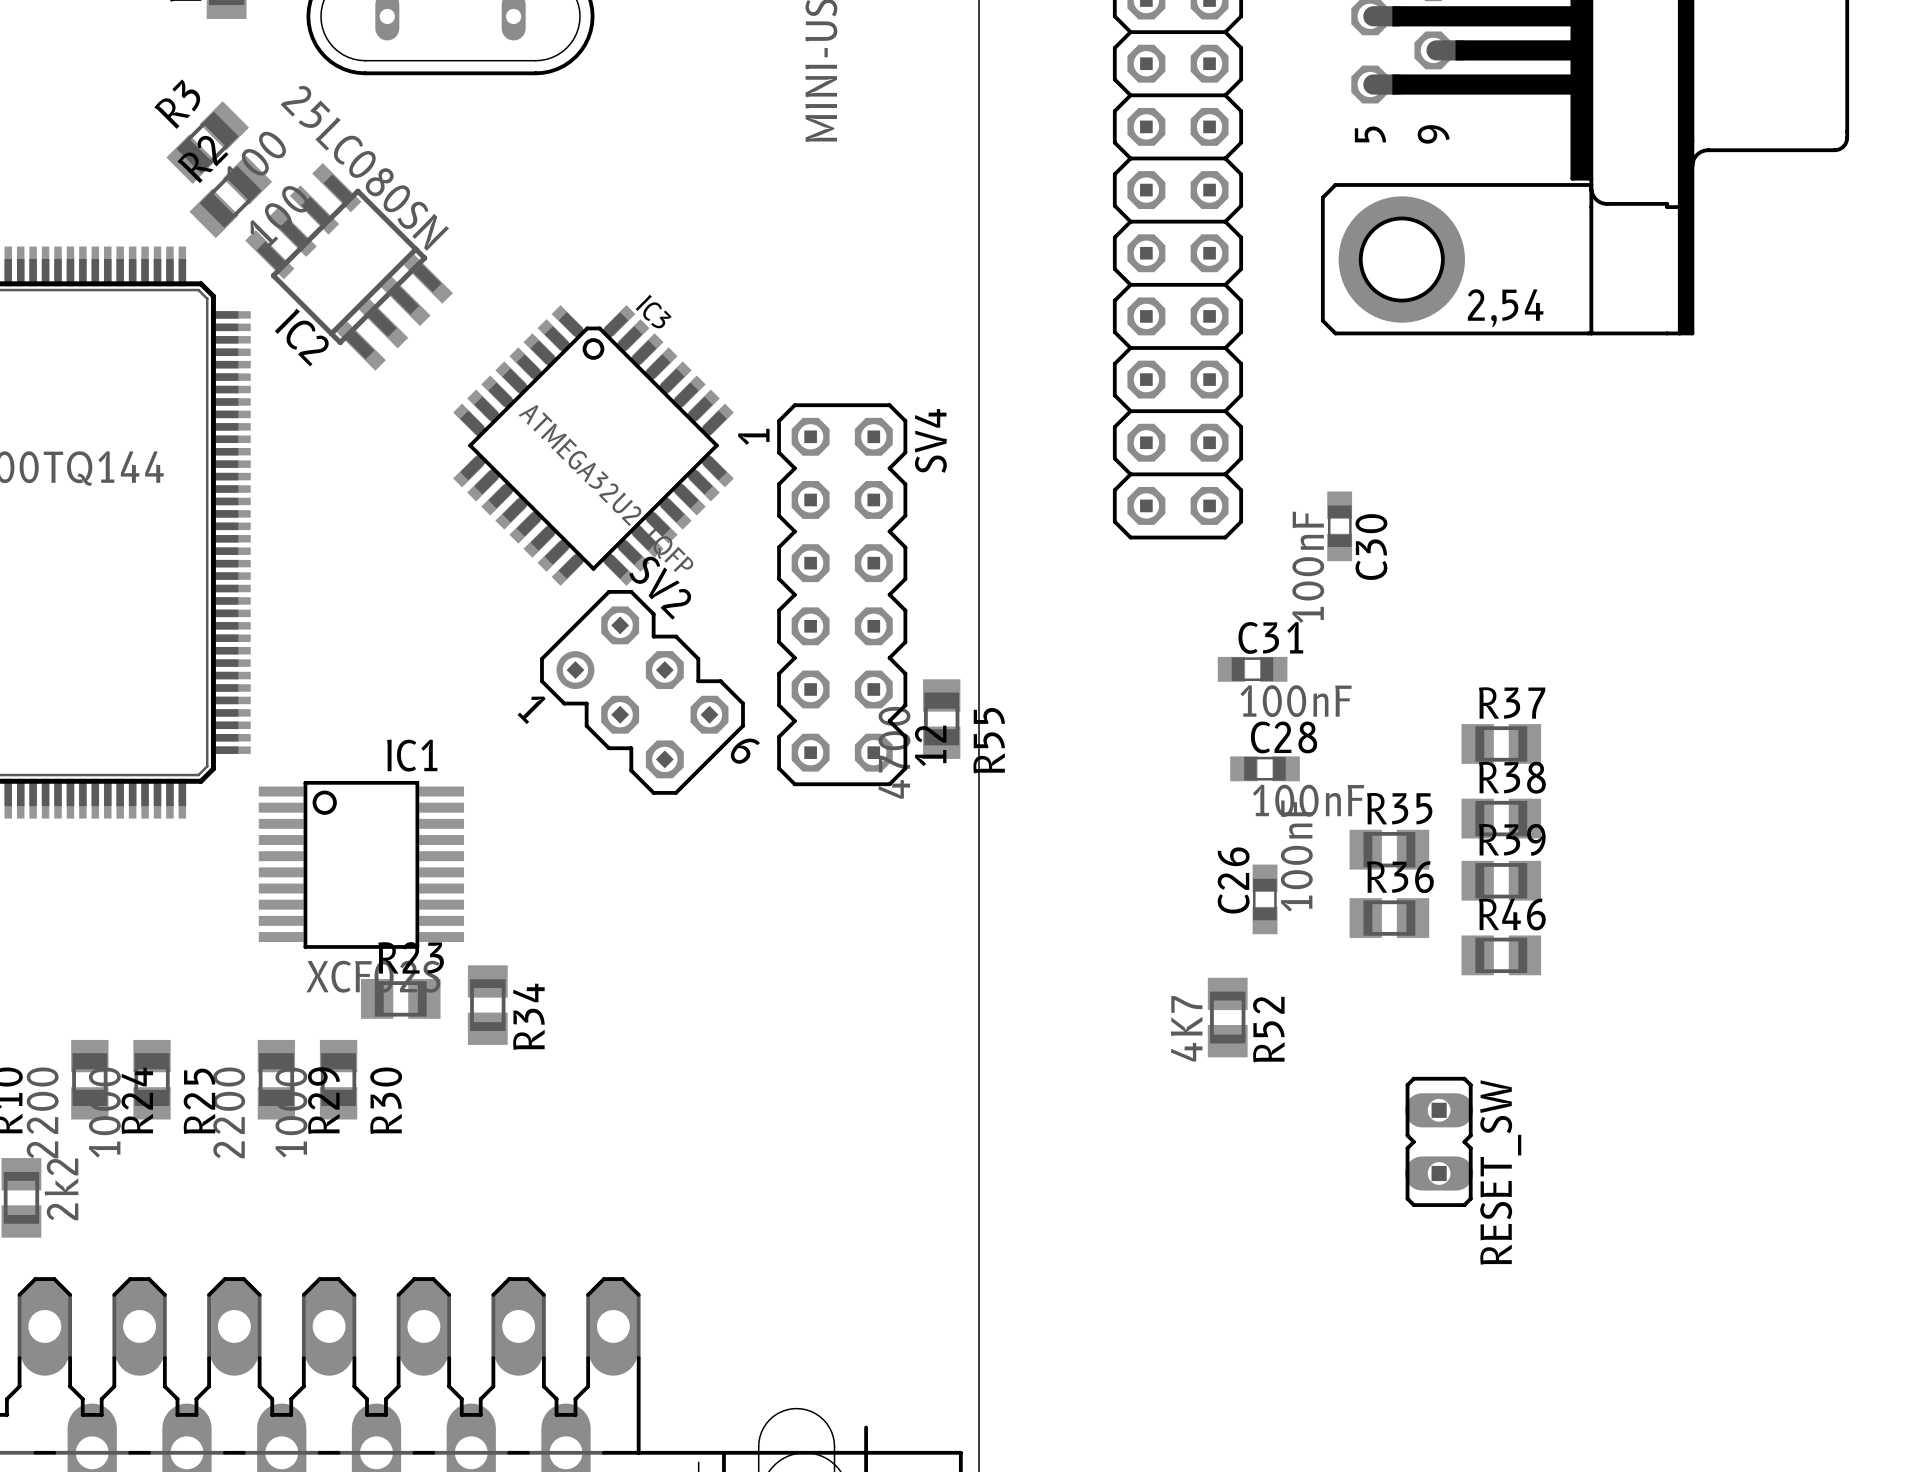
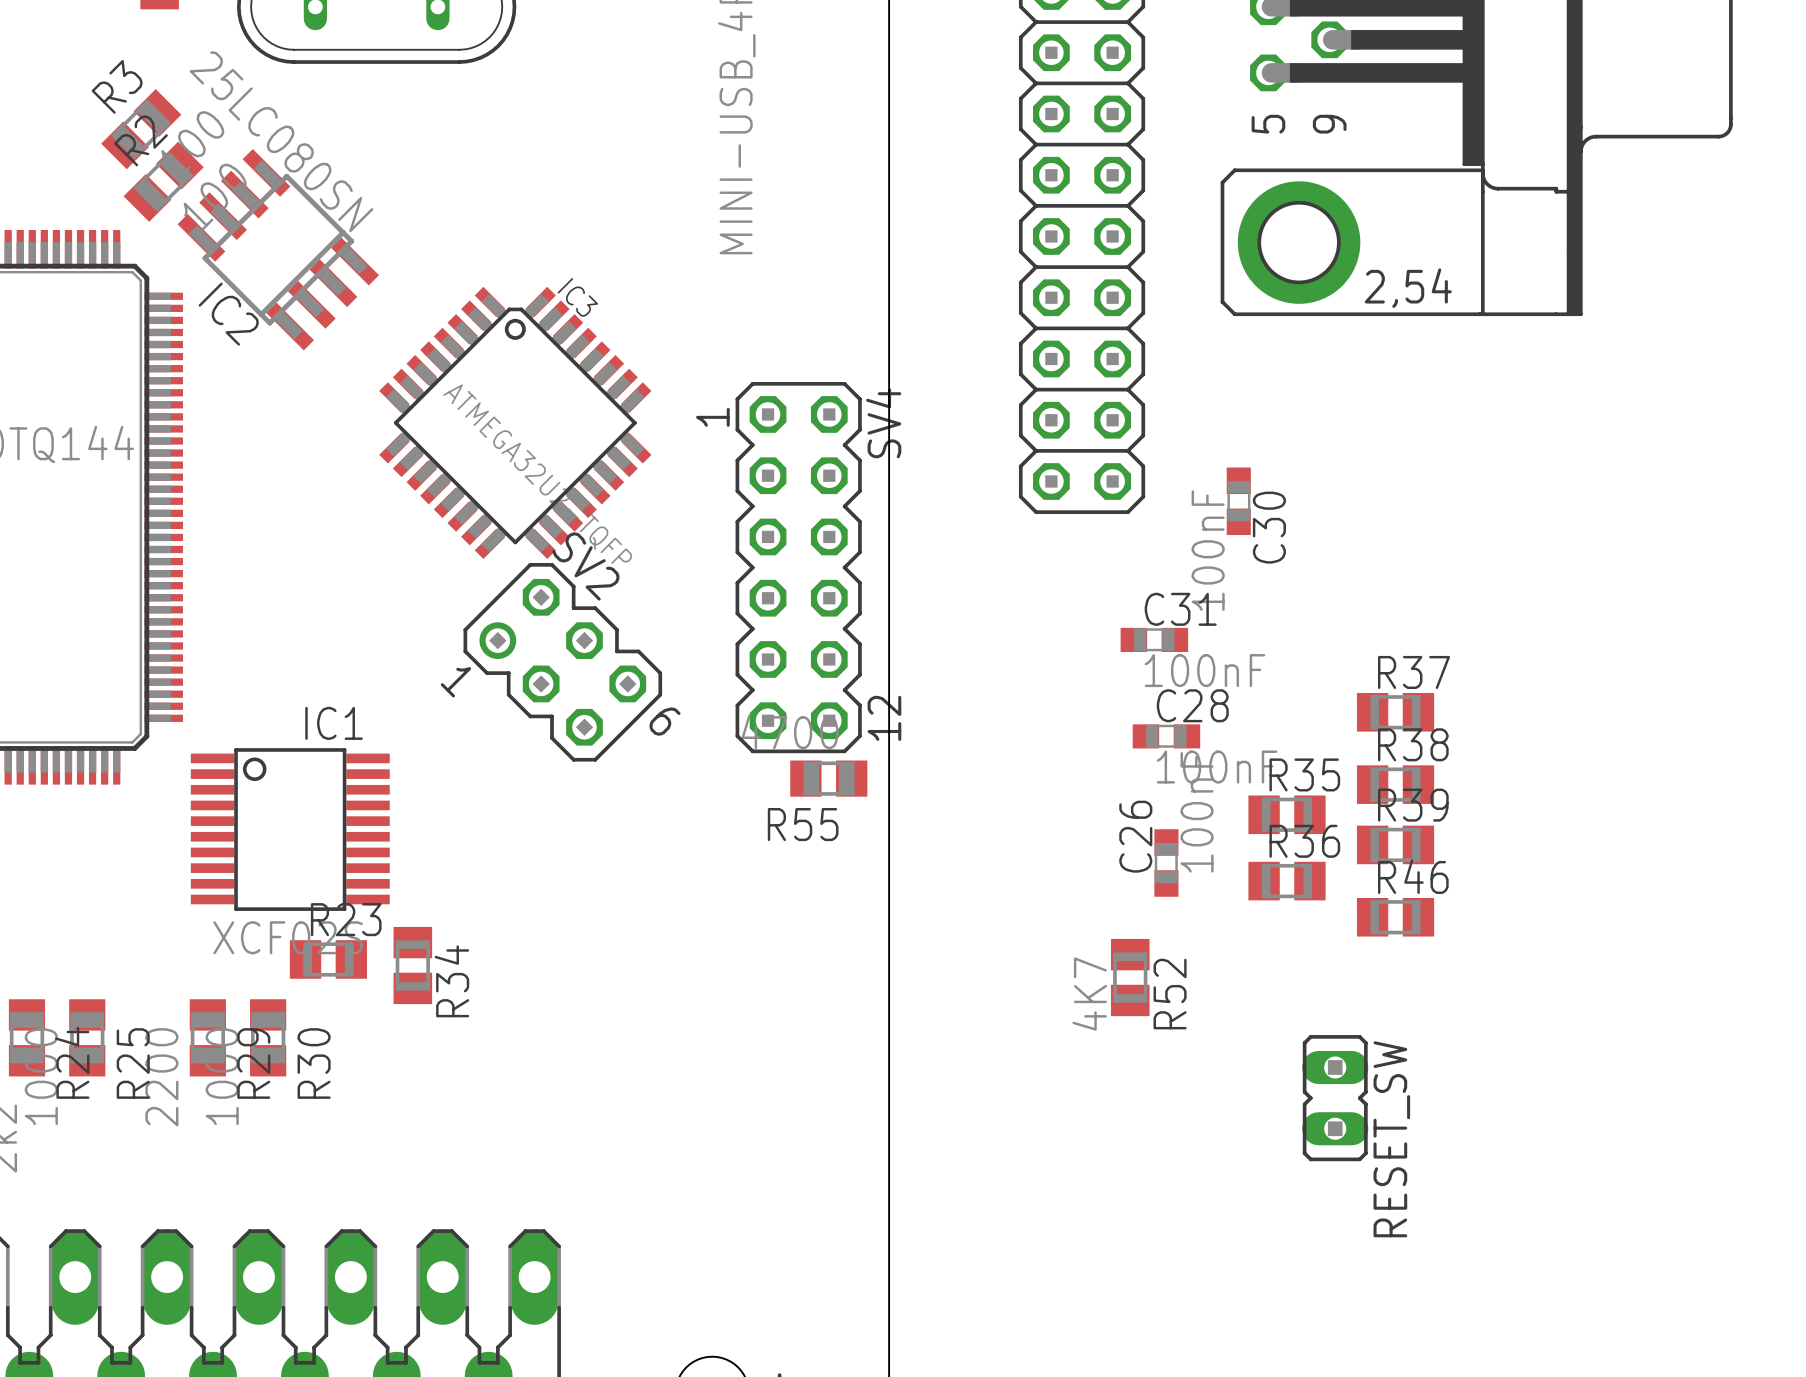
SV4 position: (842, 594) -> (798, 567)
R55 rotation: 0° (941, 719) -> 90° clockwise (828, 778)
R55 position: (941, 719) -> (828, 778)

